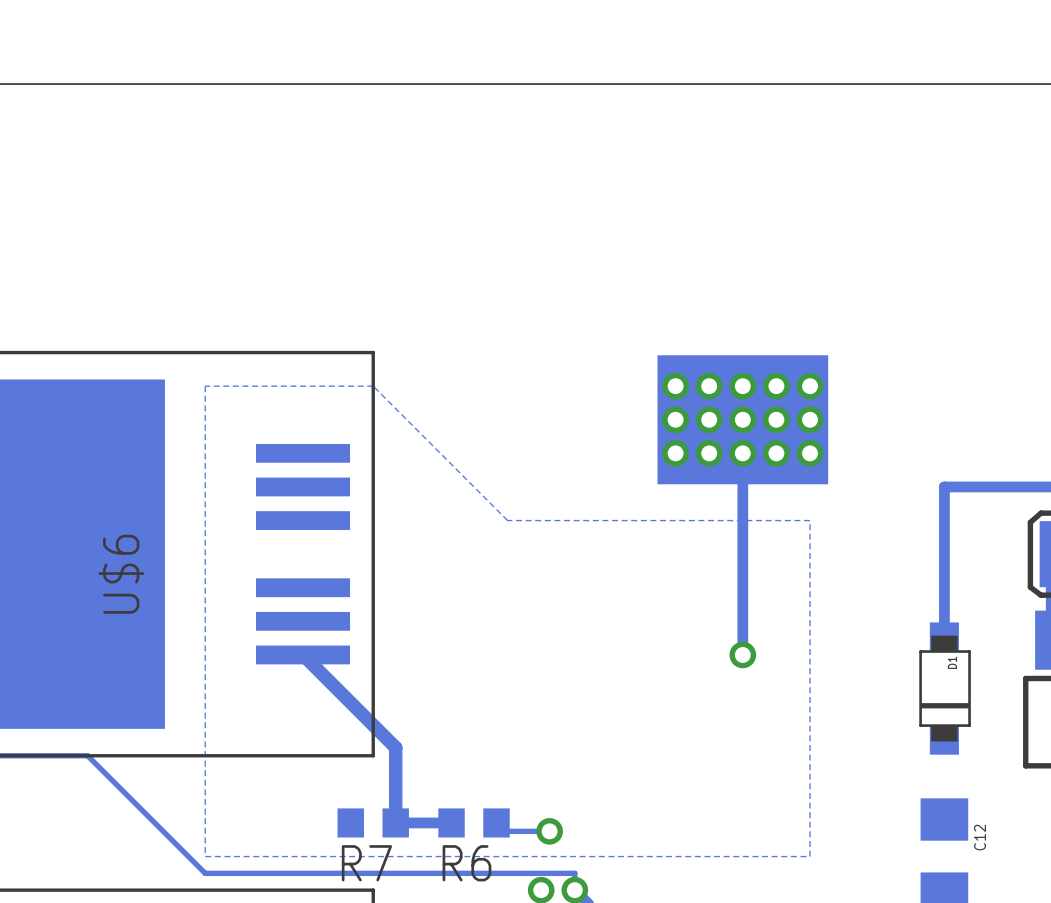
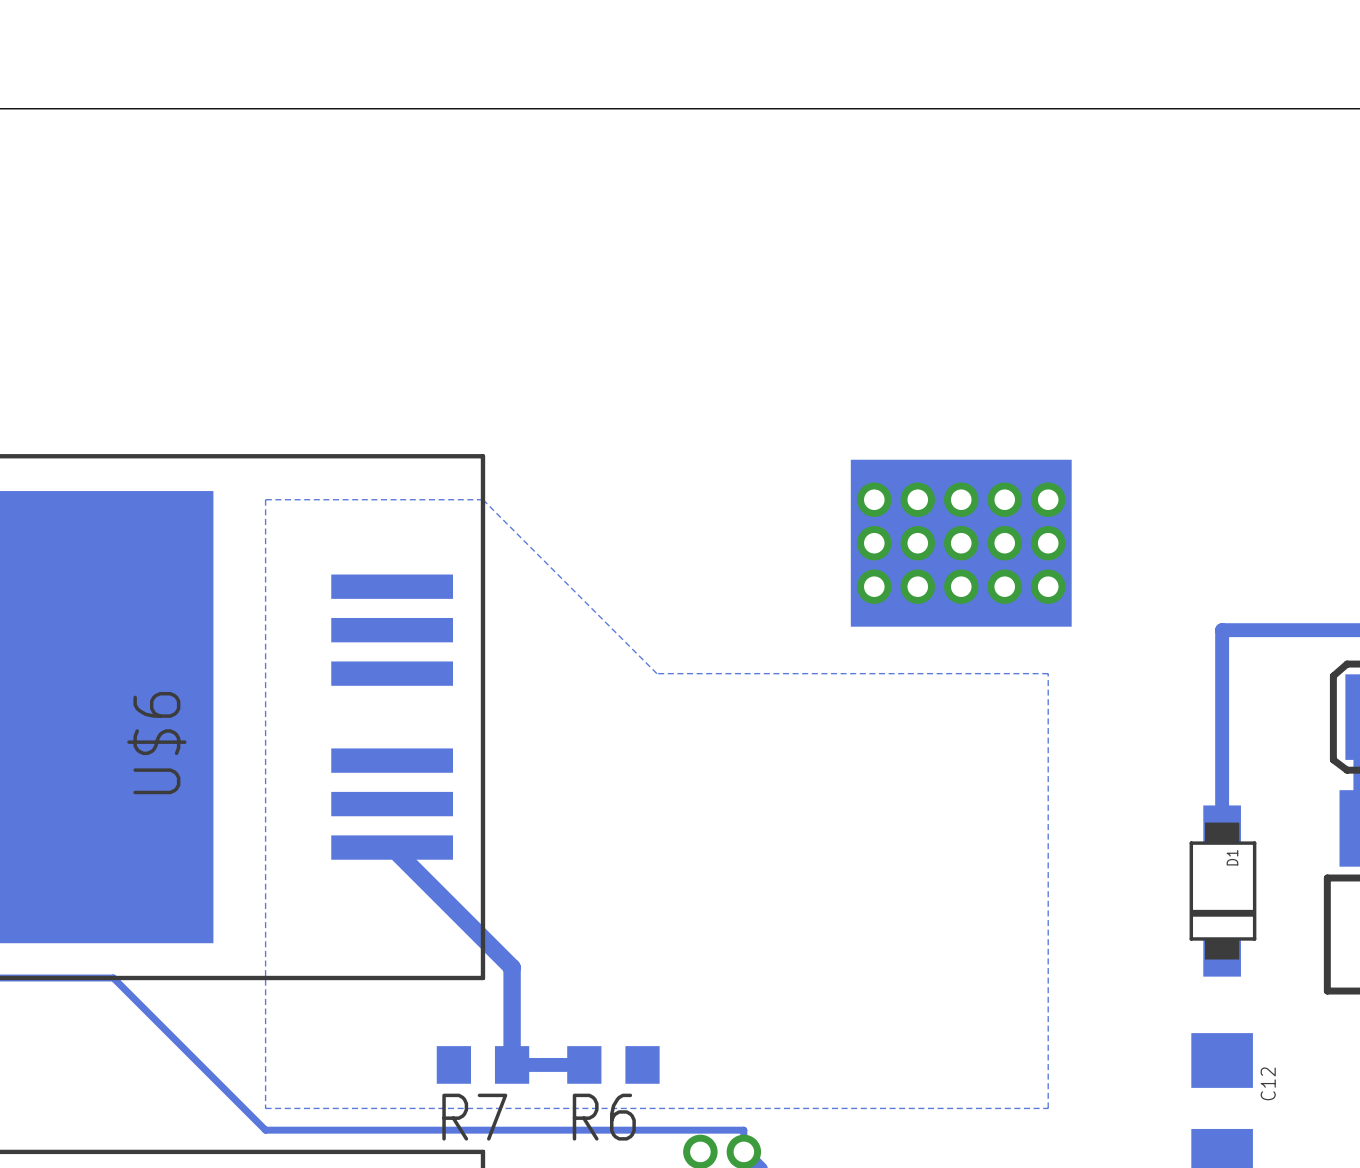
track: (742, 419) (742, 654) -> none
via: (742, 654) -> none
track: (496, 822) (504, 831) (549, 831) -> none
via: (549, 831) -> none

